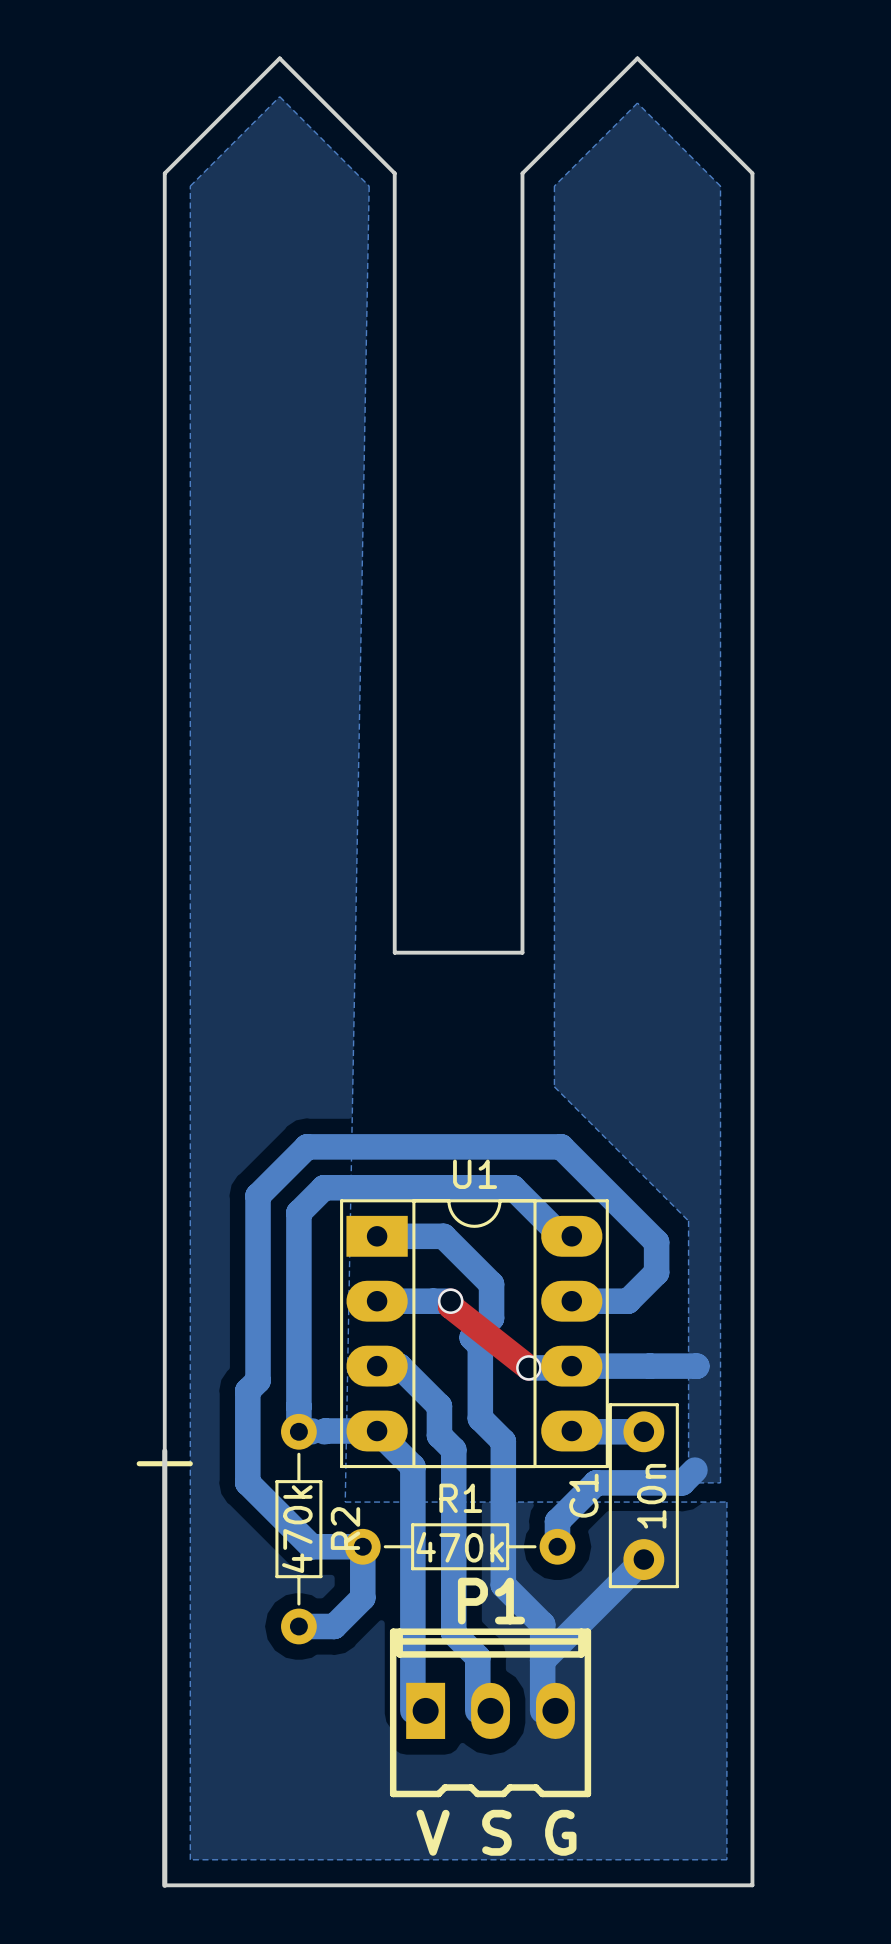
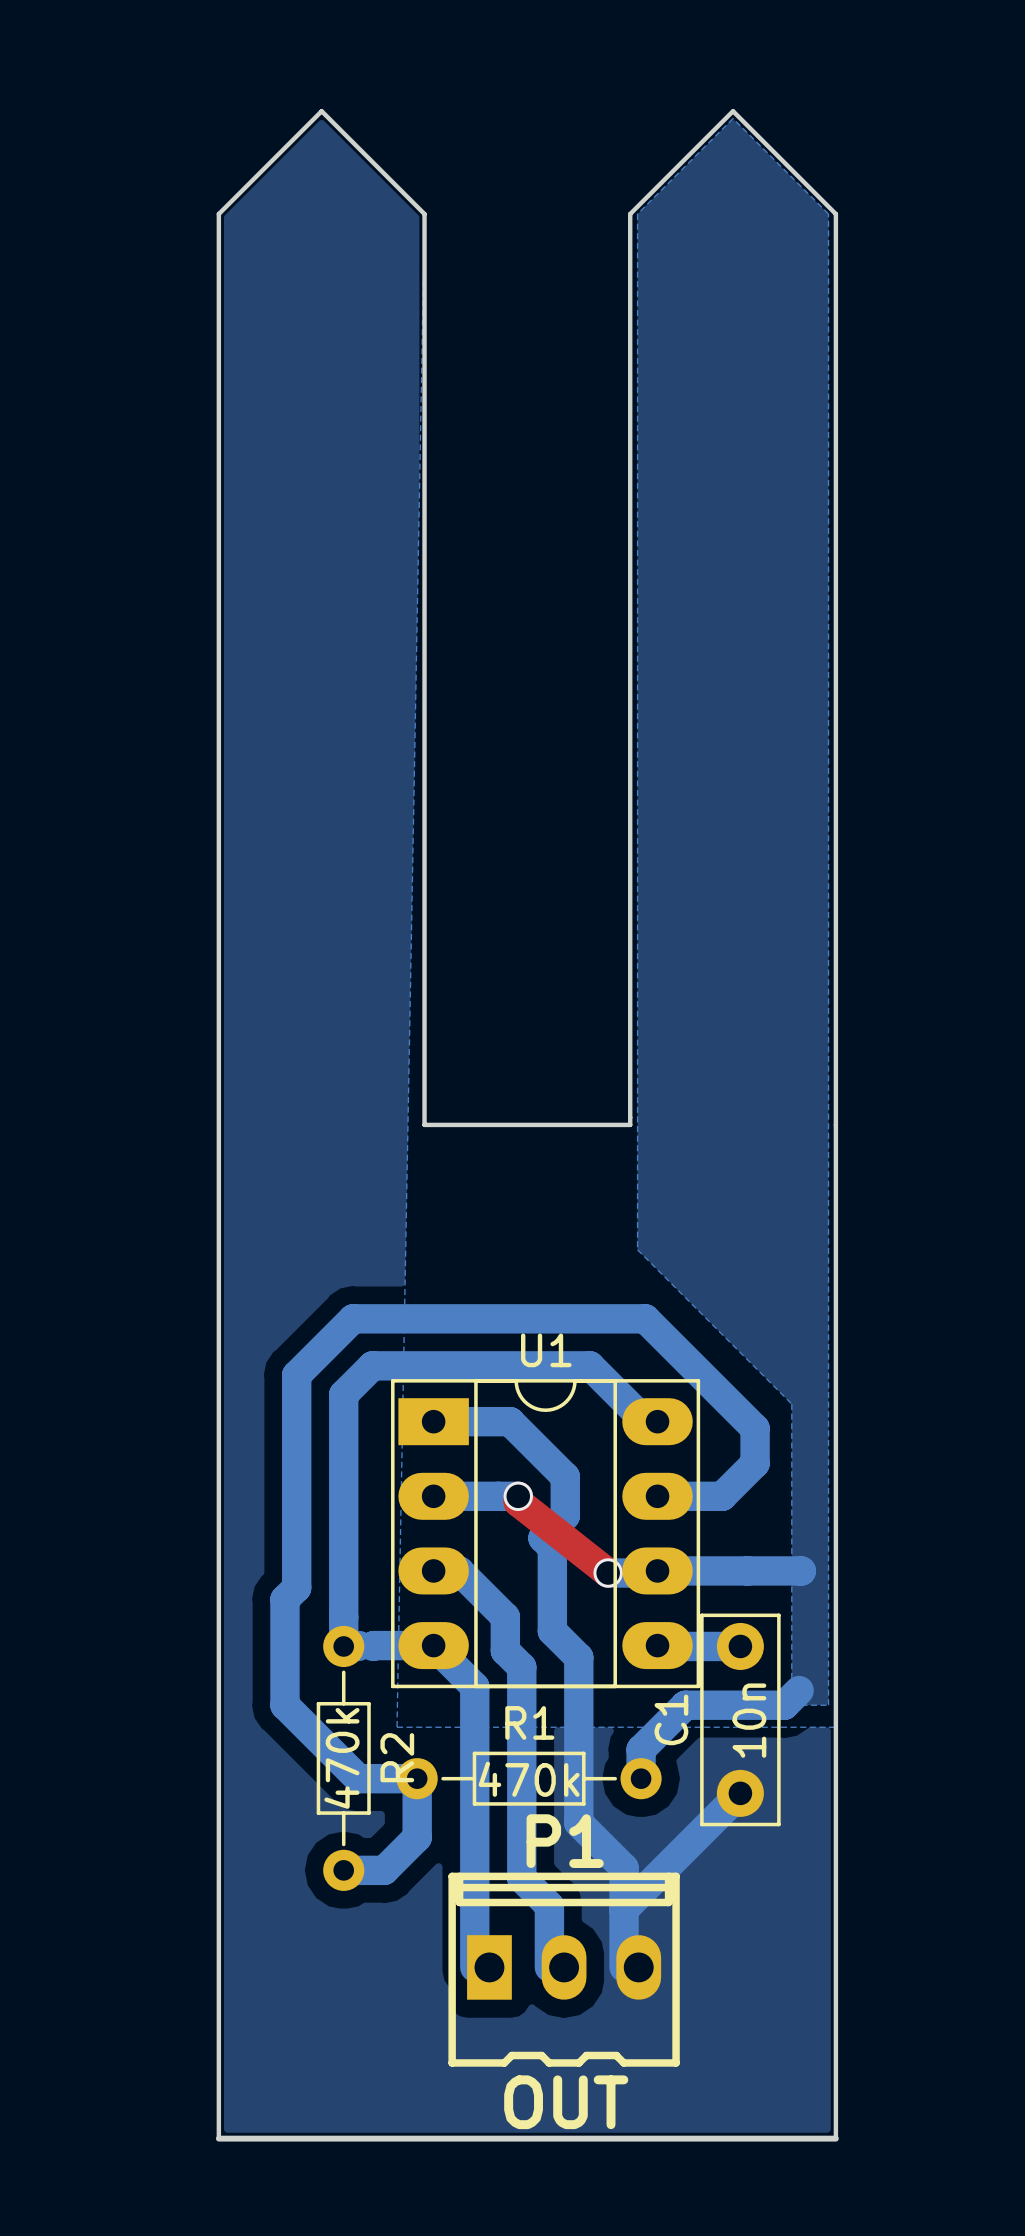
board edge: (279, 58) (394, 173) (394, 952) (522, 952) (522, 173) (637, 58) (752, 173) (752, 1885) (164, 1885) (164, 173) (279, 58) -> (321, 111) (218, 214) (218, 2138) (835, 2138) (835, 214) (733, 111) (630, 214) (630, 1124) (424, 1124) (424, 214) (321, 111)
line: (139, 1463) (190, 1463) -> none
P1 value: none -> OUT (566, 2102)
text: V (433, 1832) -> none
text: S (496, 1832) -> none
text: G (560, 1832) -> none

